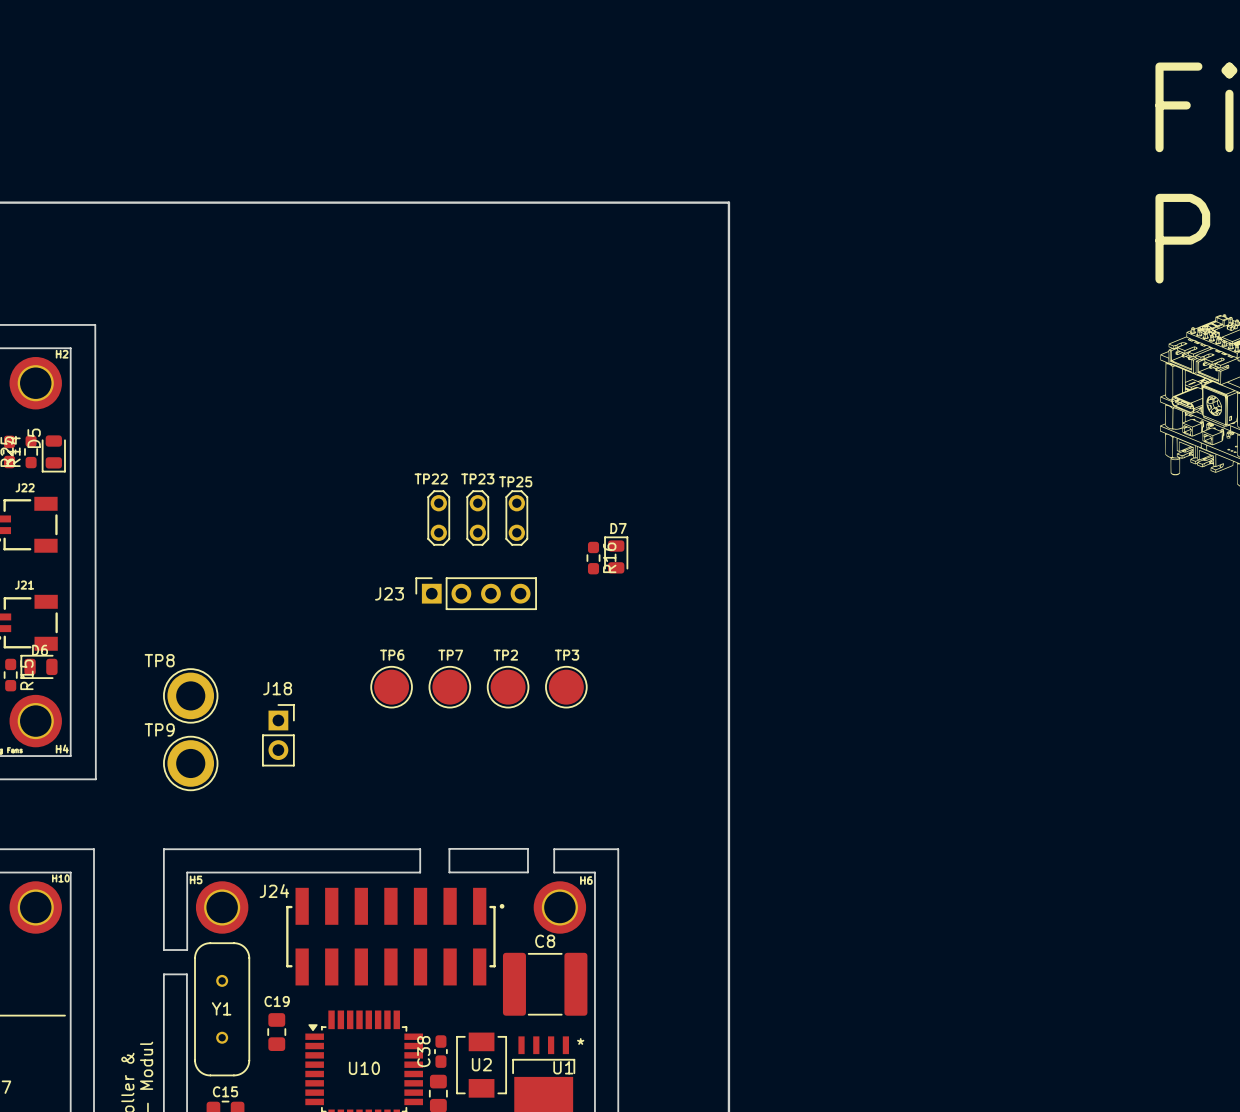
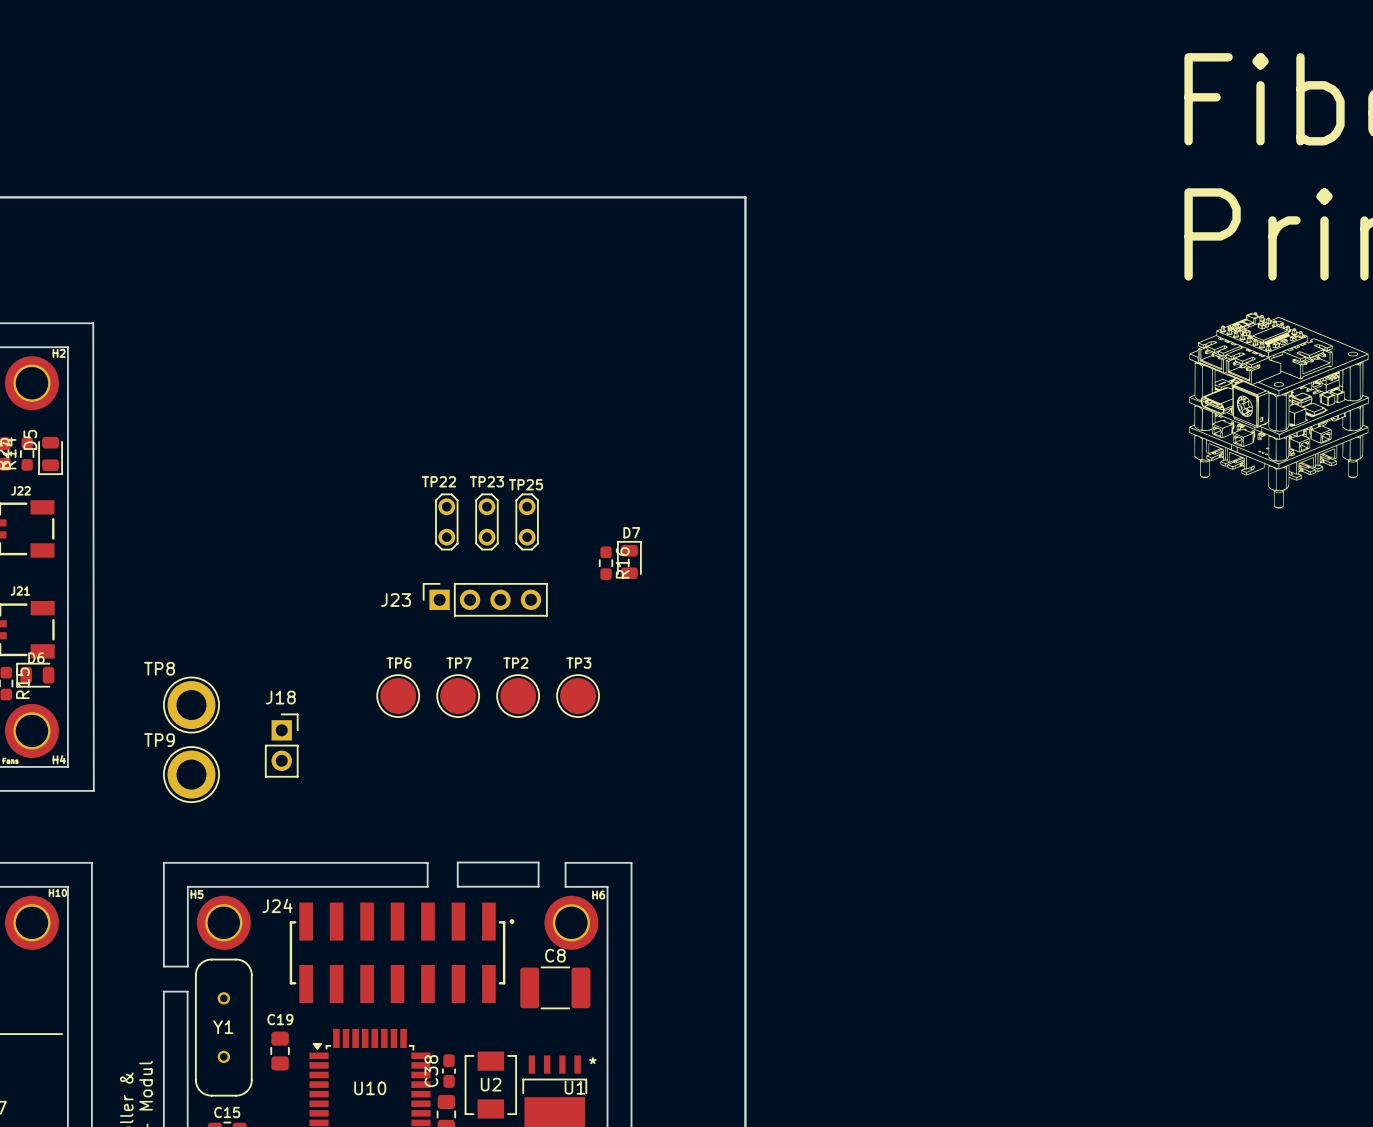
C8 footprint: [502, 952, 588, 1016] -> [520, 966, 591, 1010]

